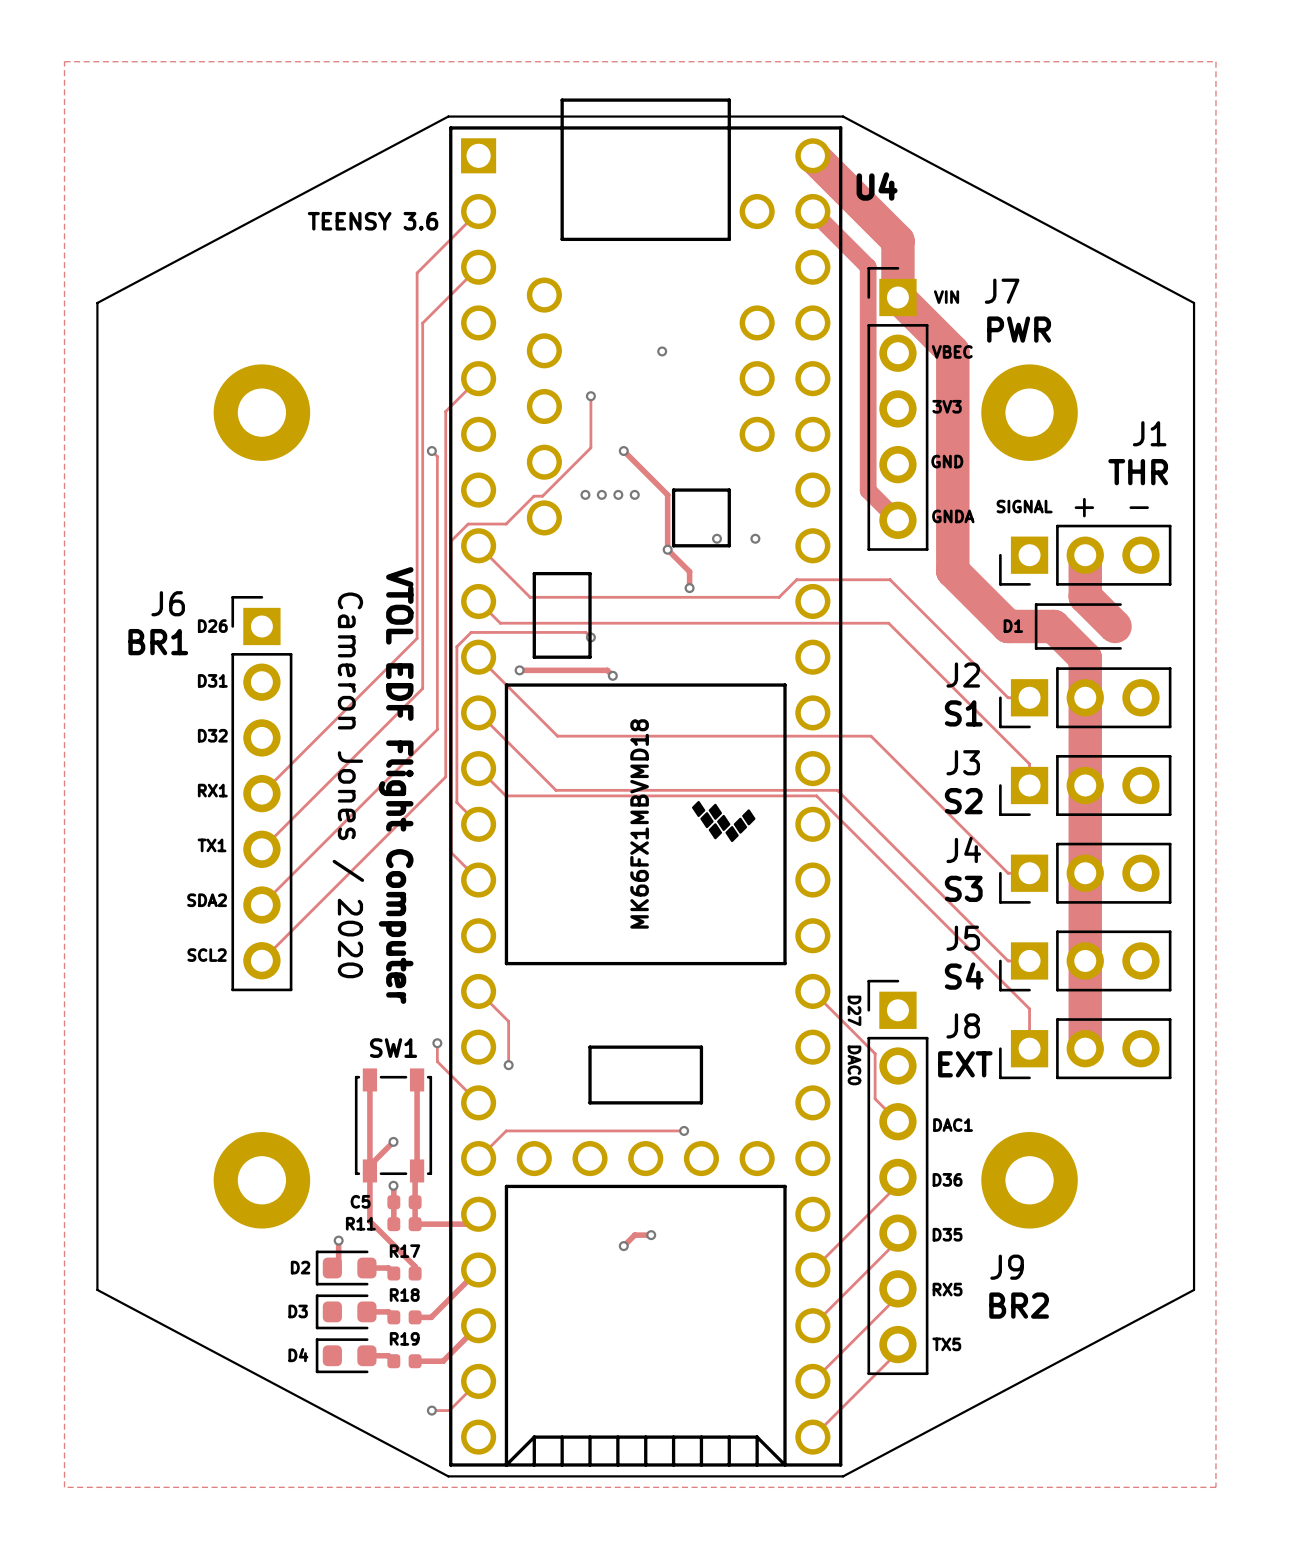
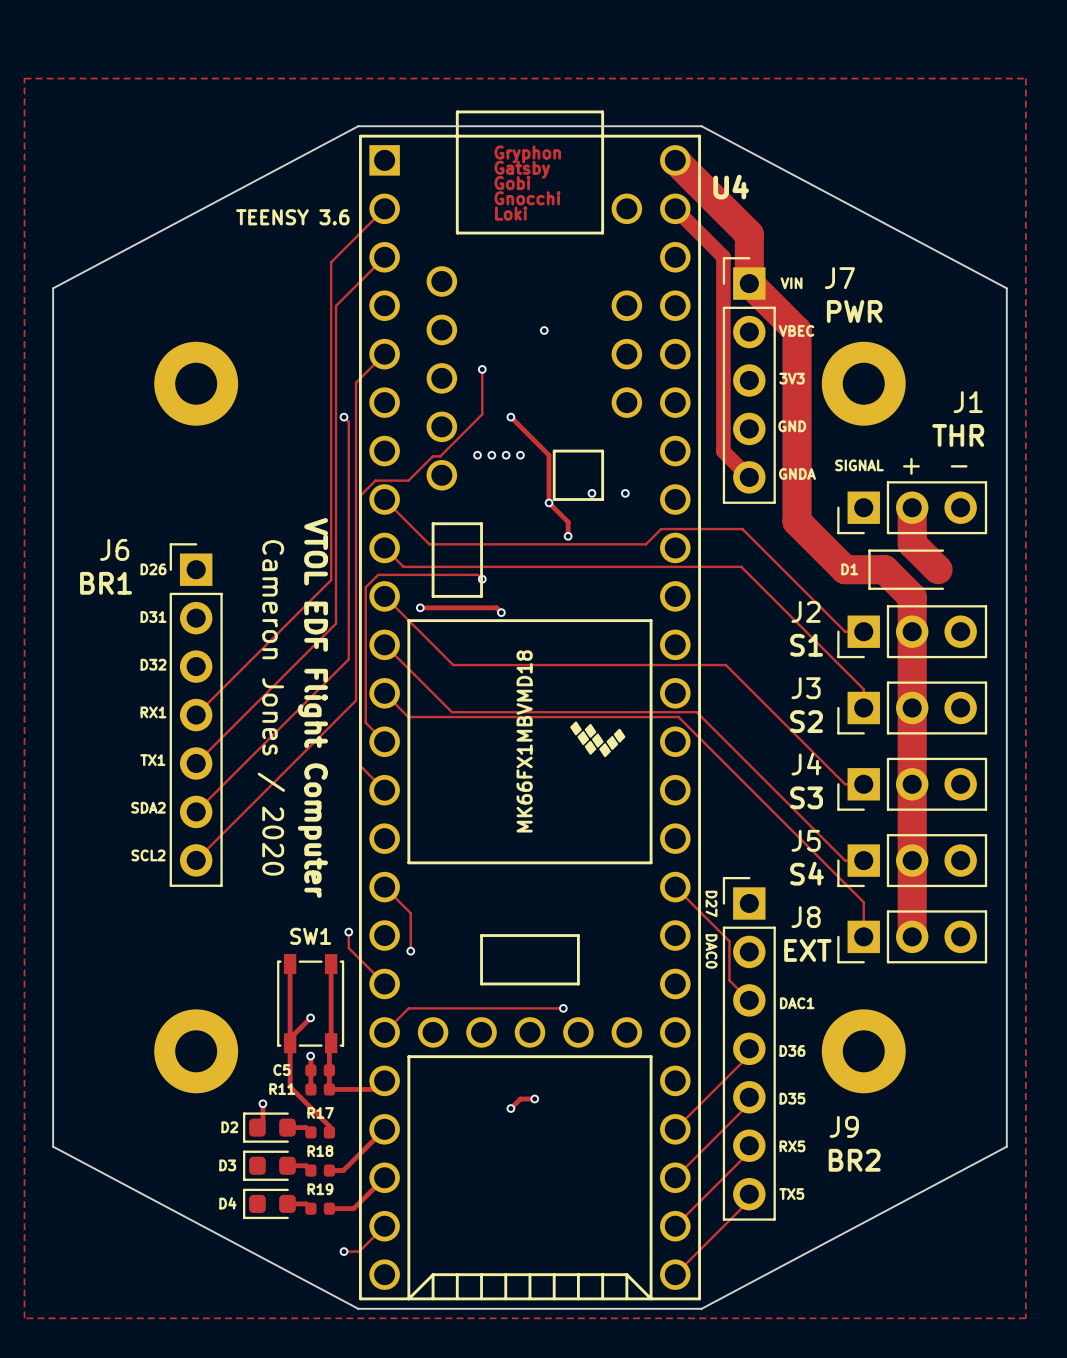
text: none -> Gryphon (527, 154)
text: none -> Gatsby (522, 169)
text: none -> Gobi (512, 183)
text: none -> Gnocchi (527, 198)
text: none -> Loki (511, 213)

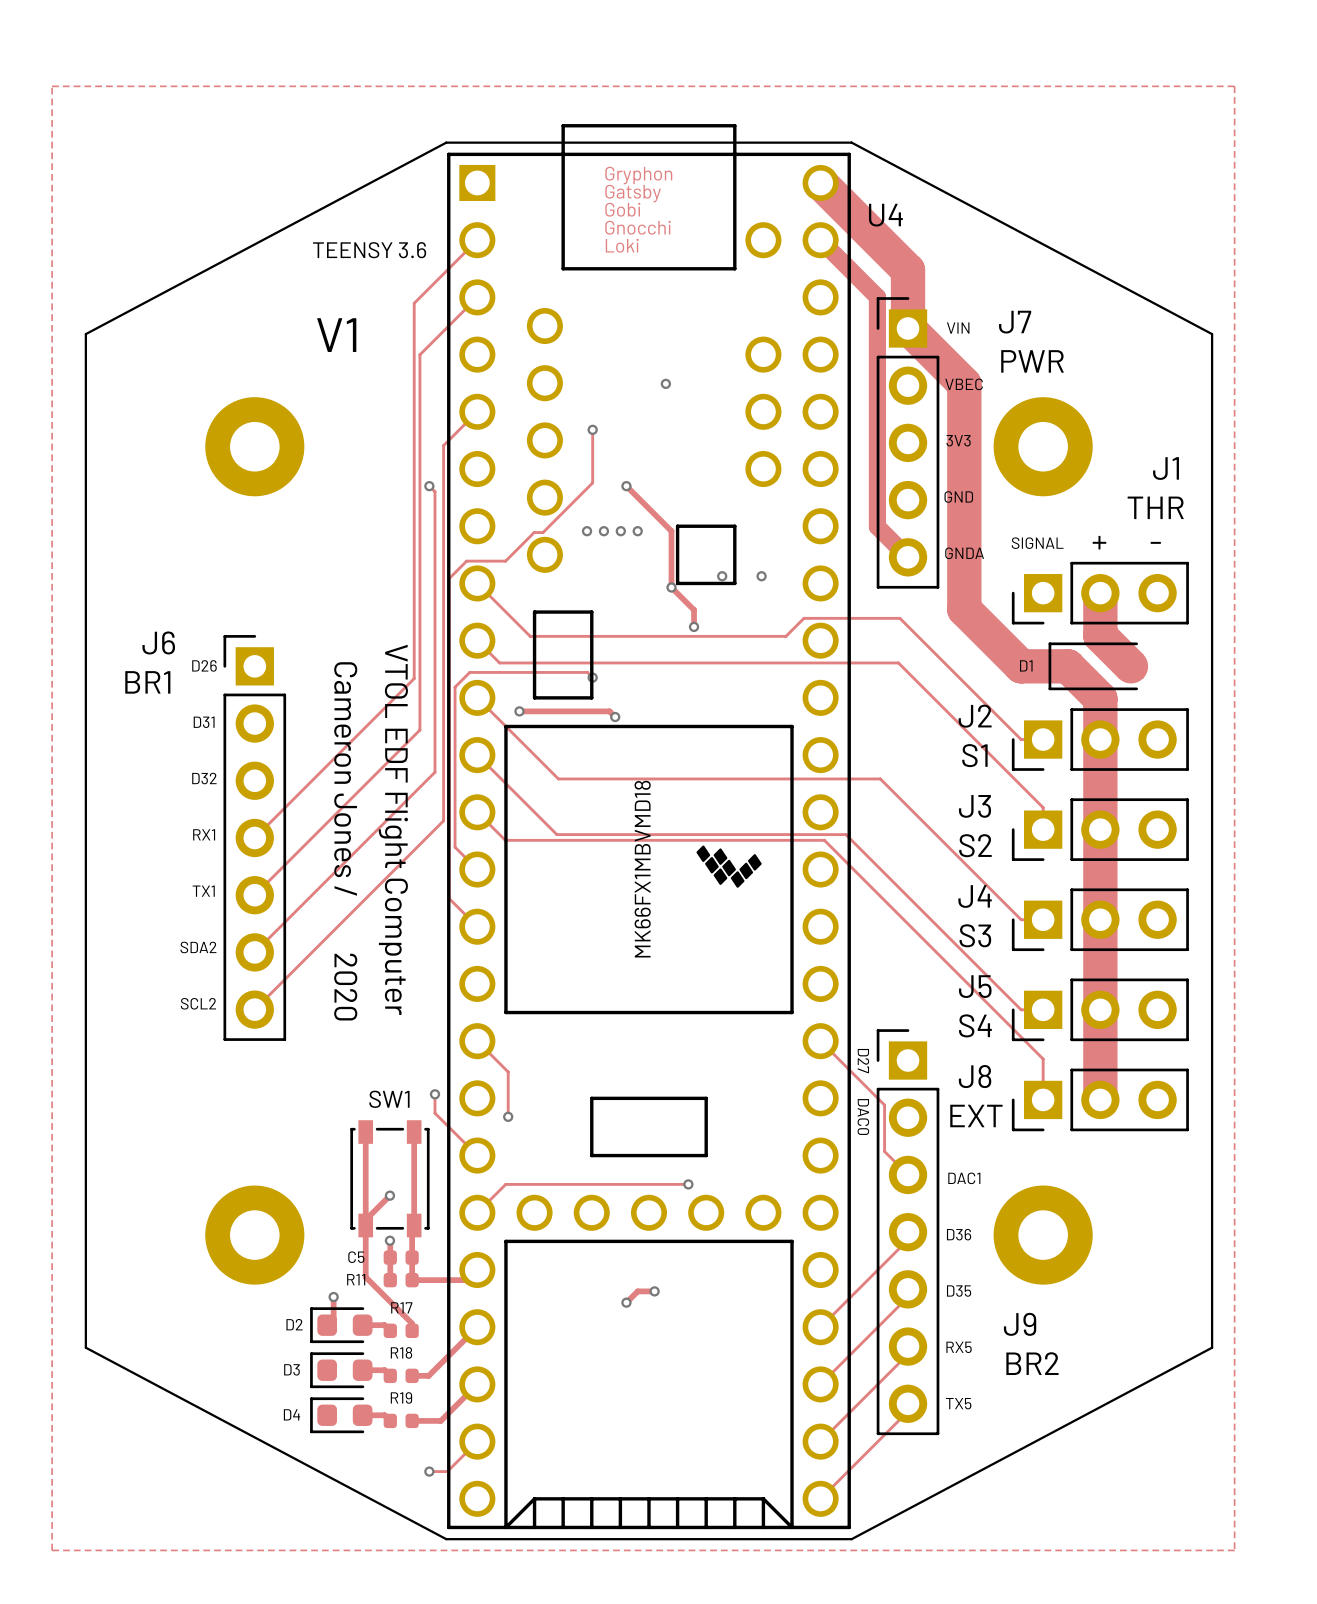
text: none -> V1 (336, 335)

